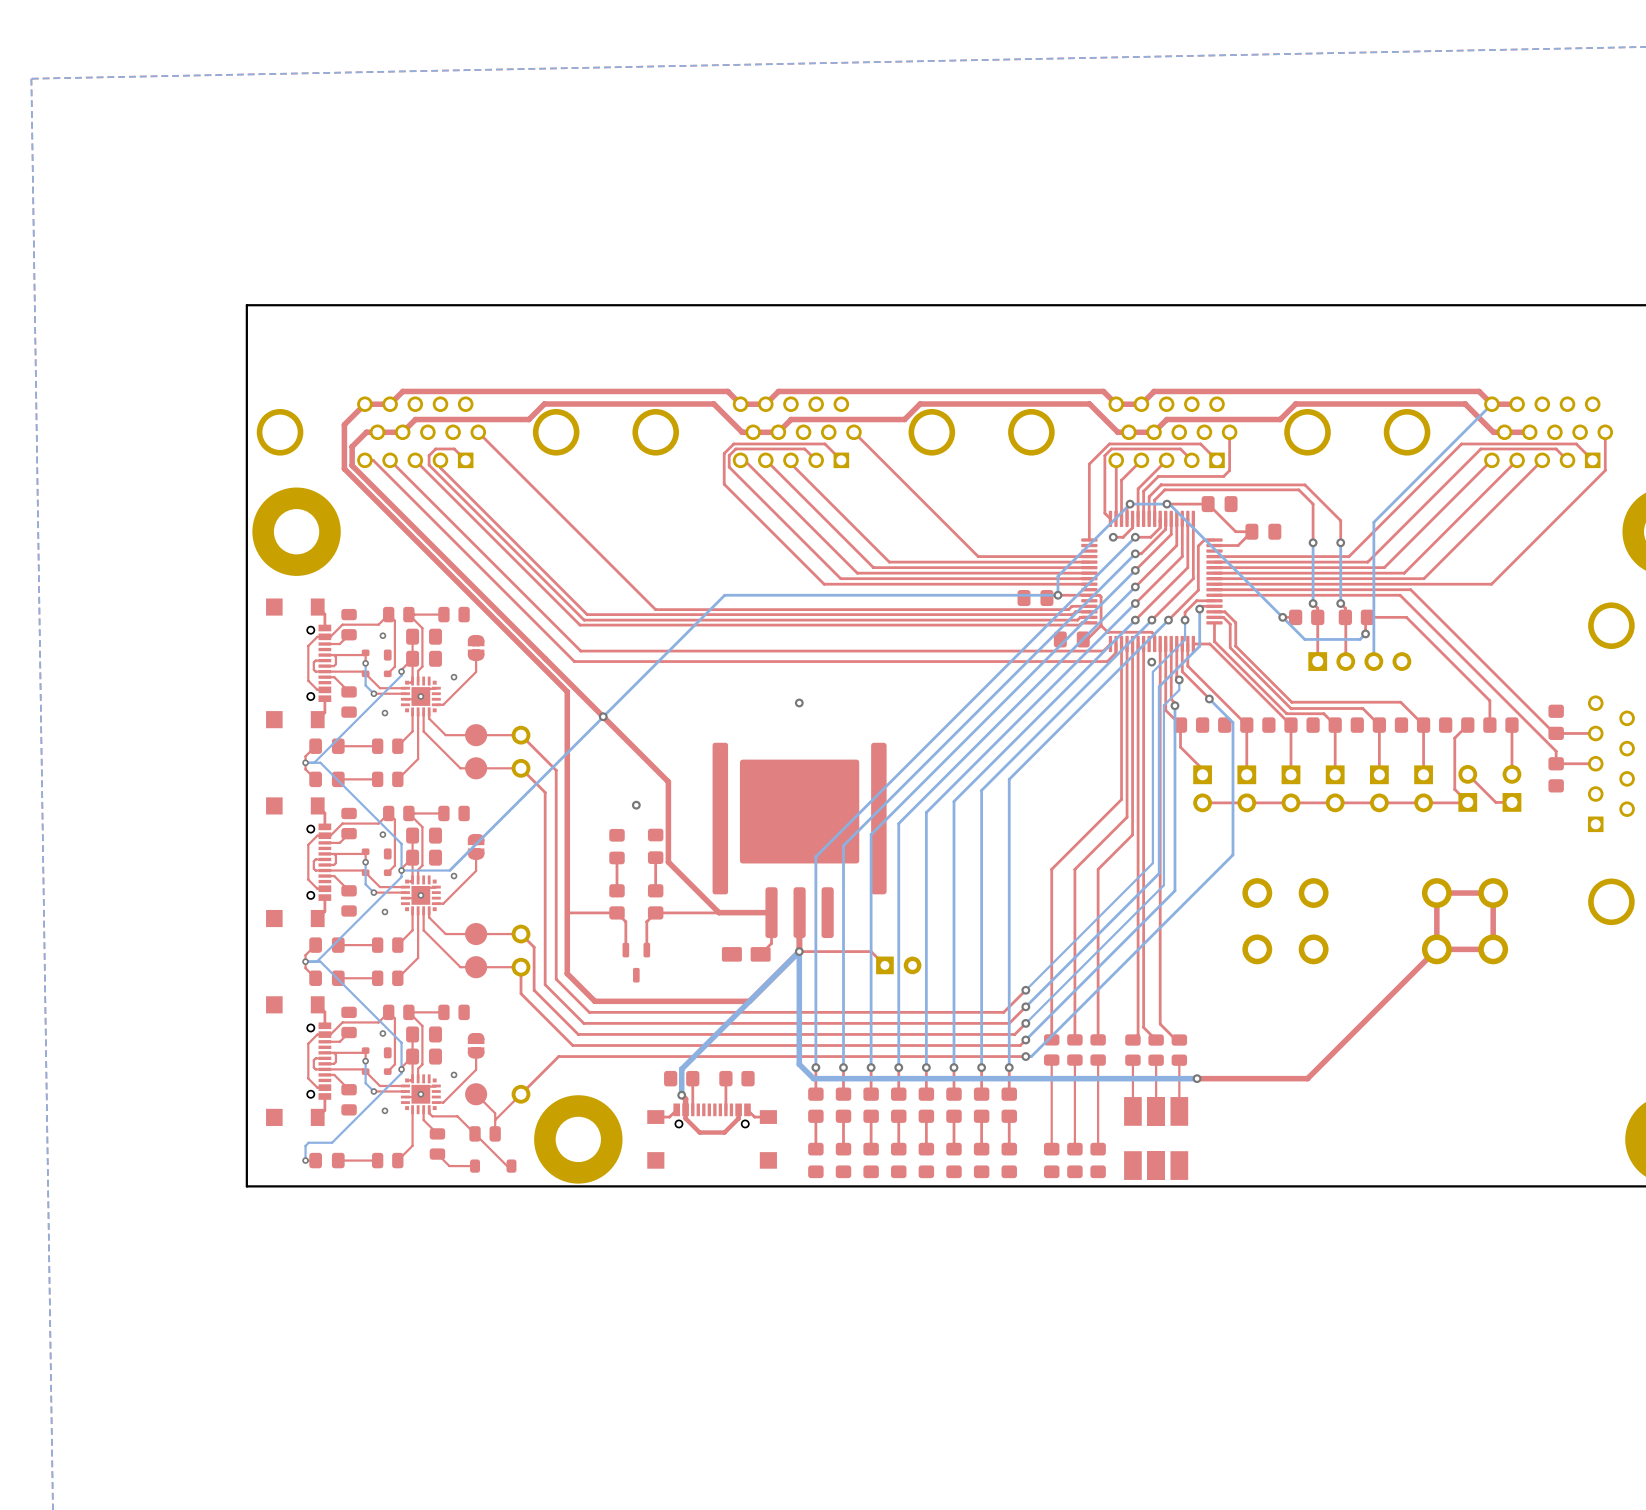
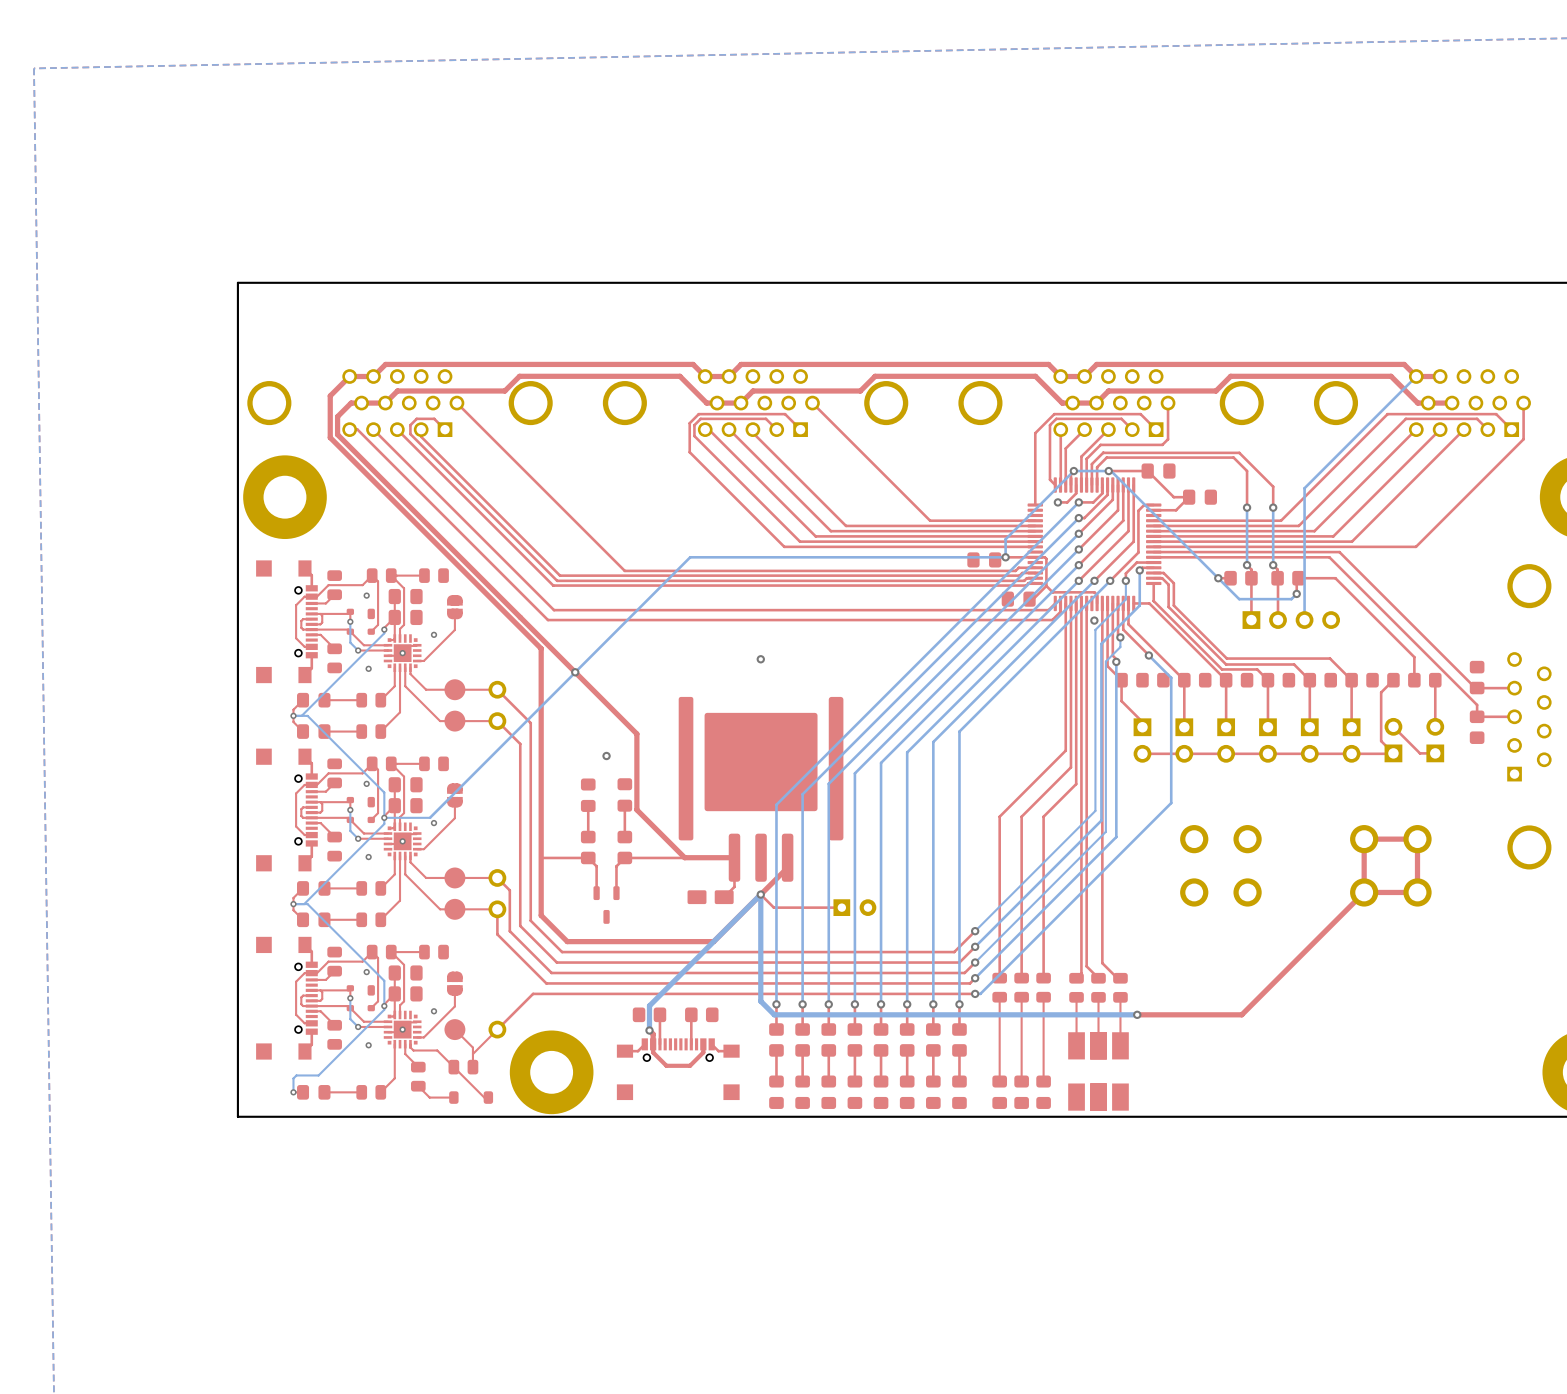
top track: none -> (787, 857) (787, 867) (761, 894)
top track: (799, 951) (799, 912) (799, 951) (871, 951) (884, 965) -> (760, 894) (773, 907) (841, 907)

